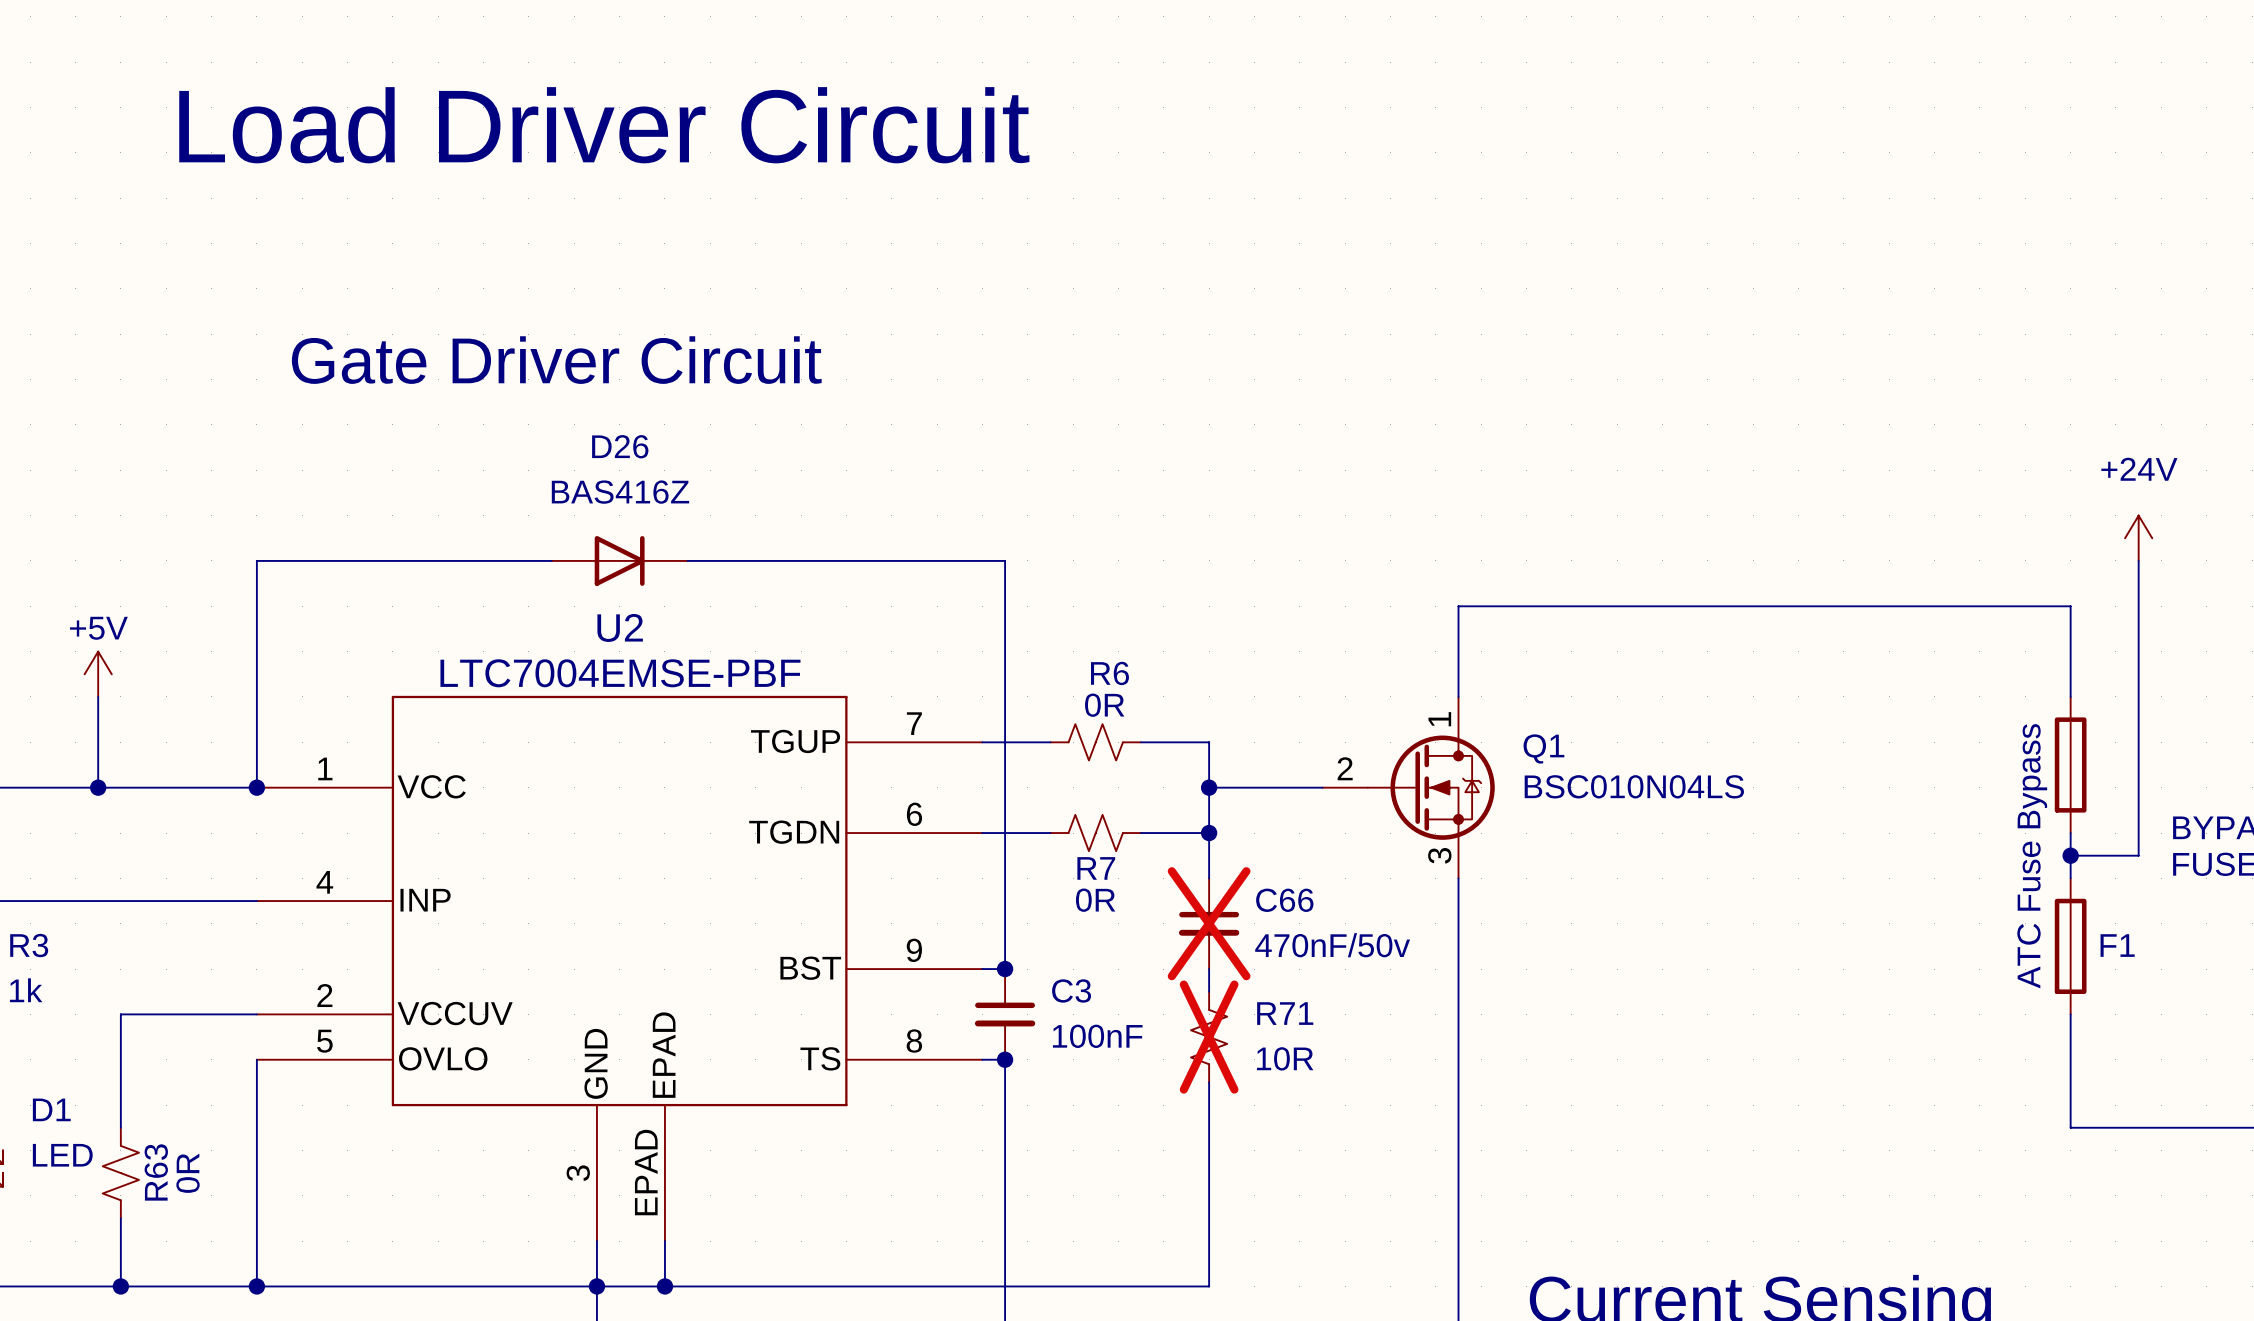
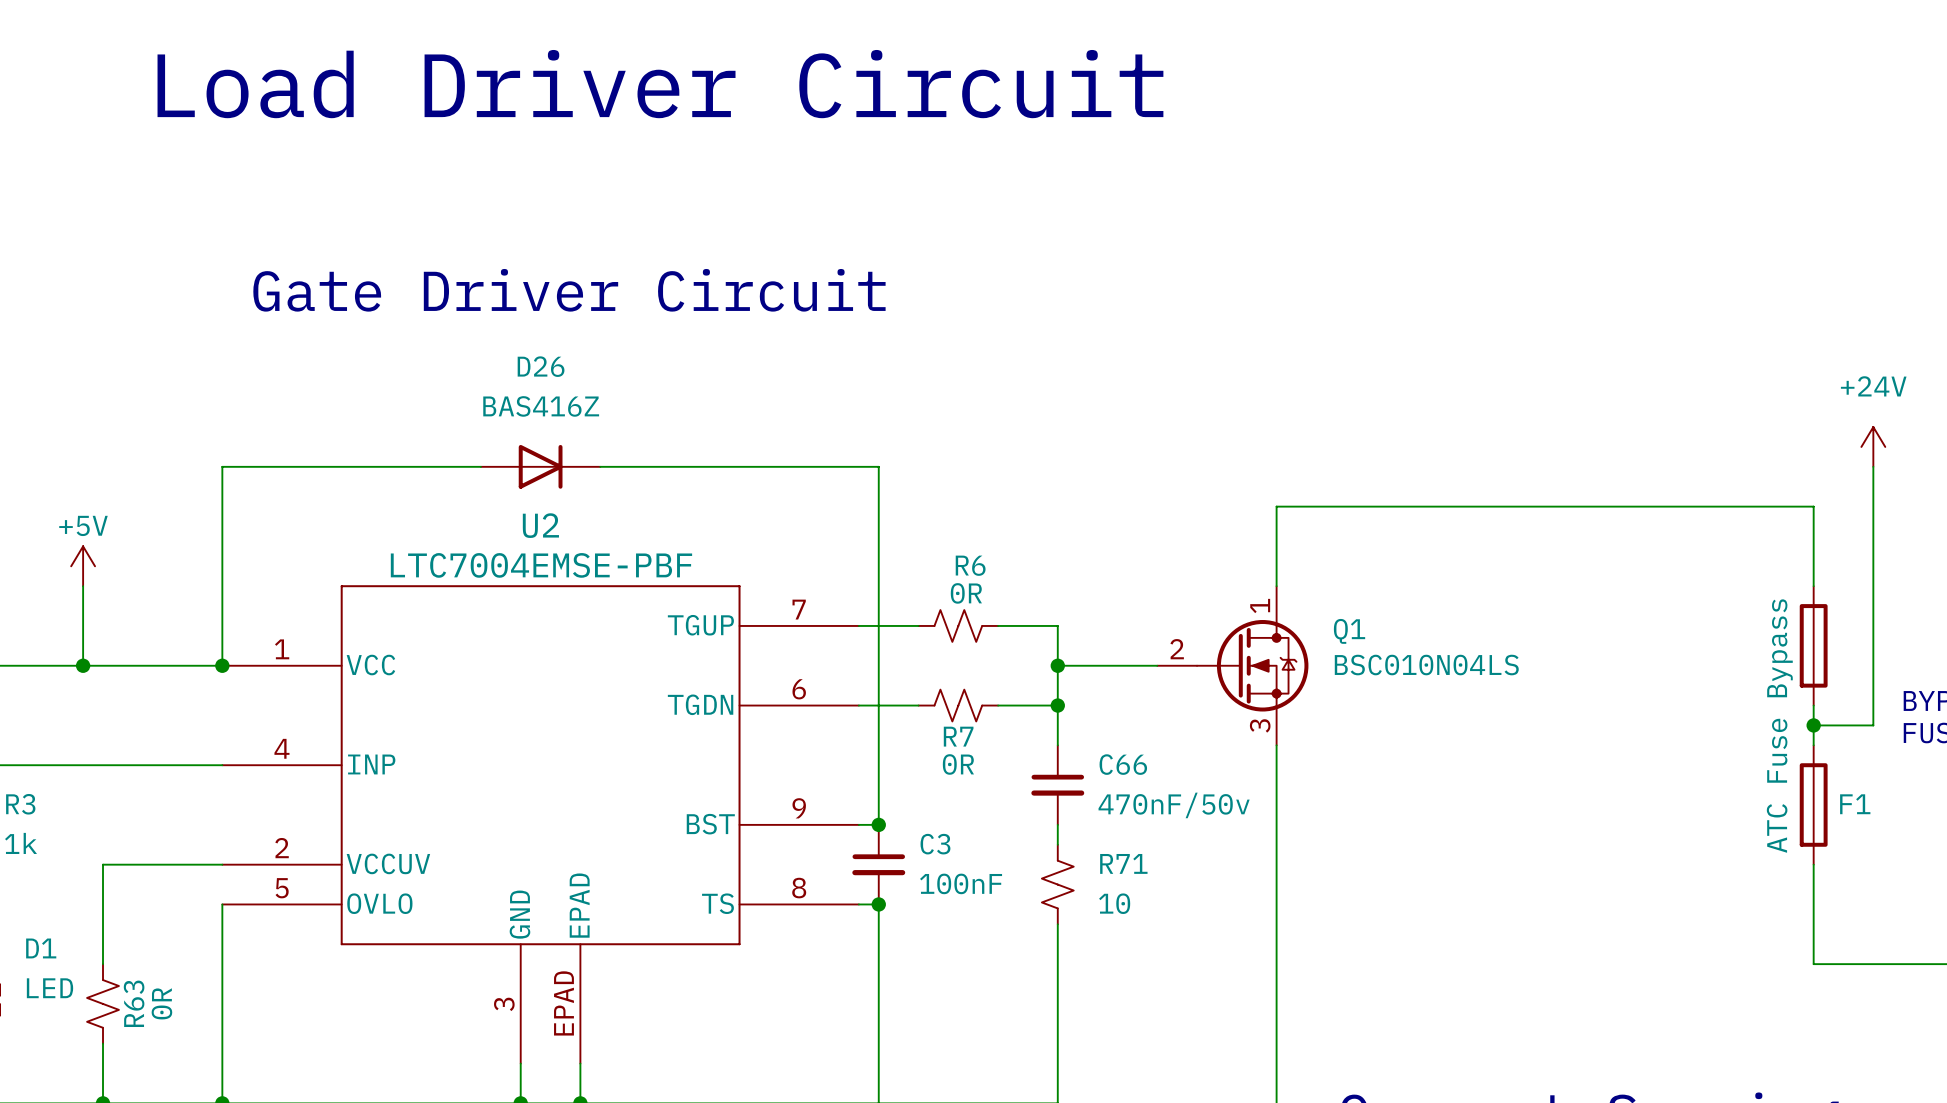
C66 do-not-place cross: (1209, 923) -> none
R71 do-not-place cross: (1209, 1037) -> none
R71 value: 10R (1285, 1058) -> 10 (1114, 903)

